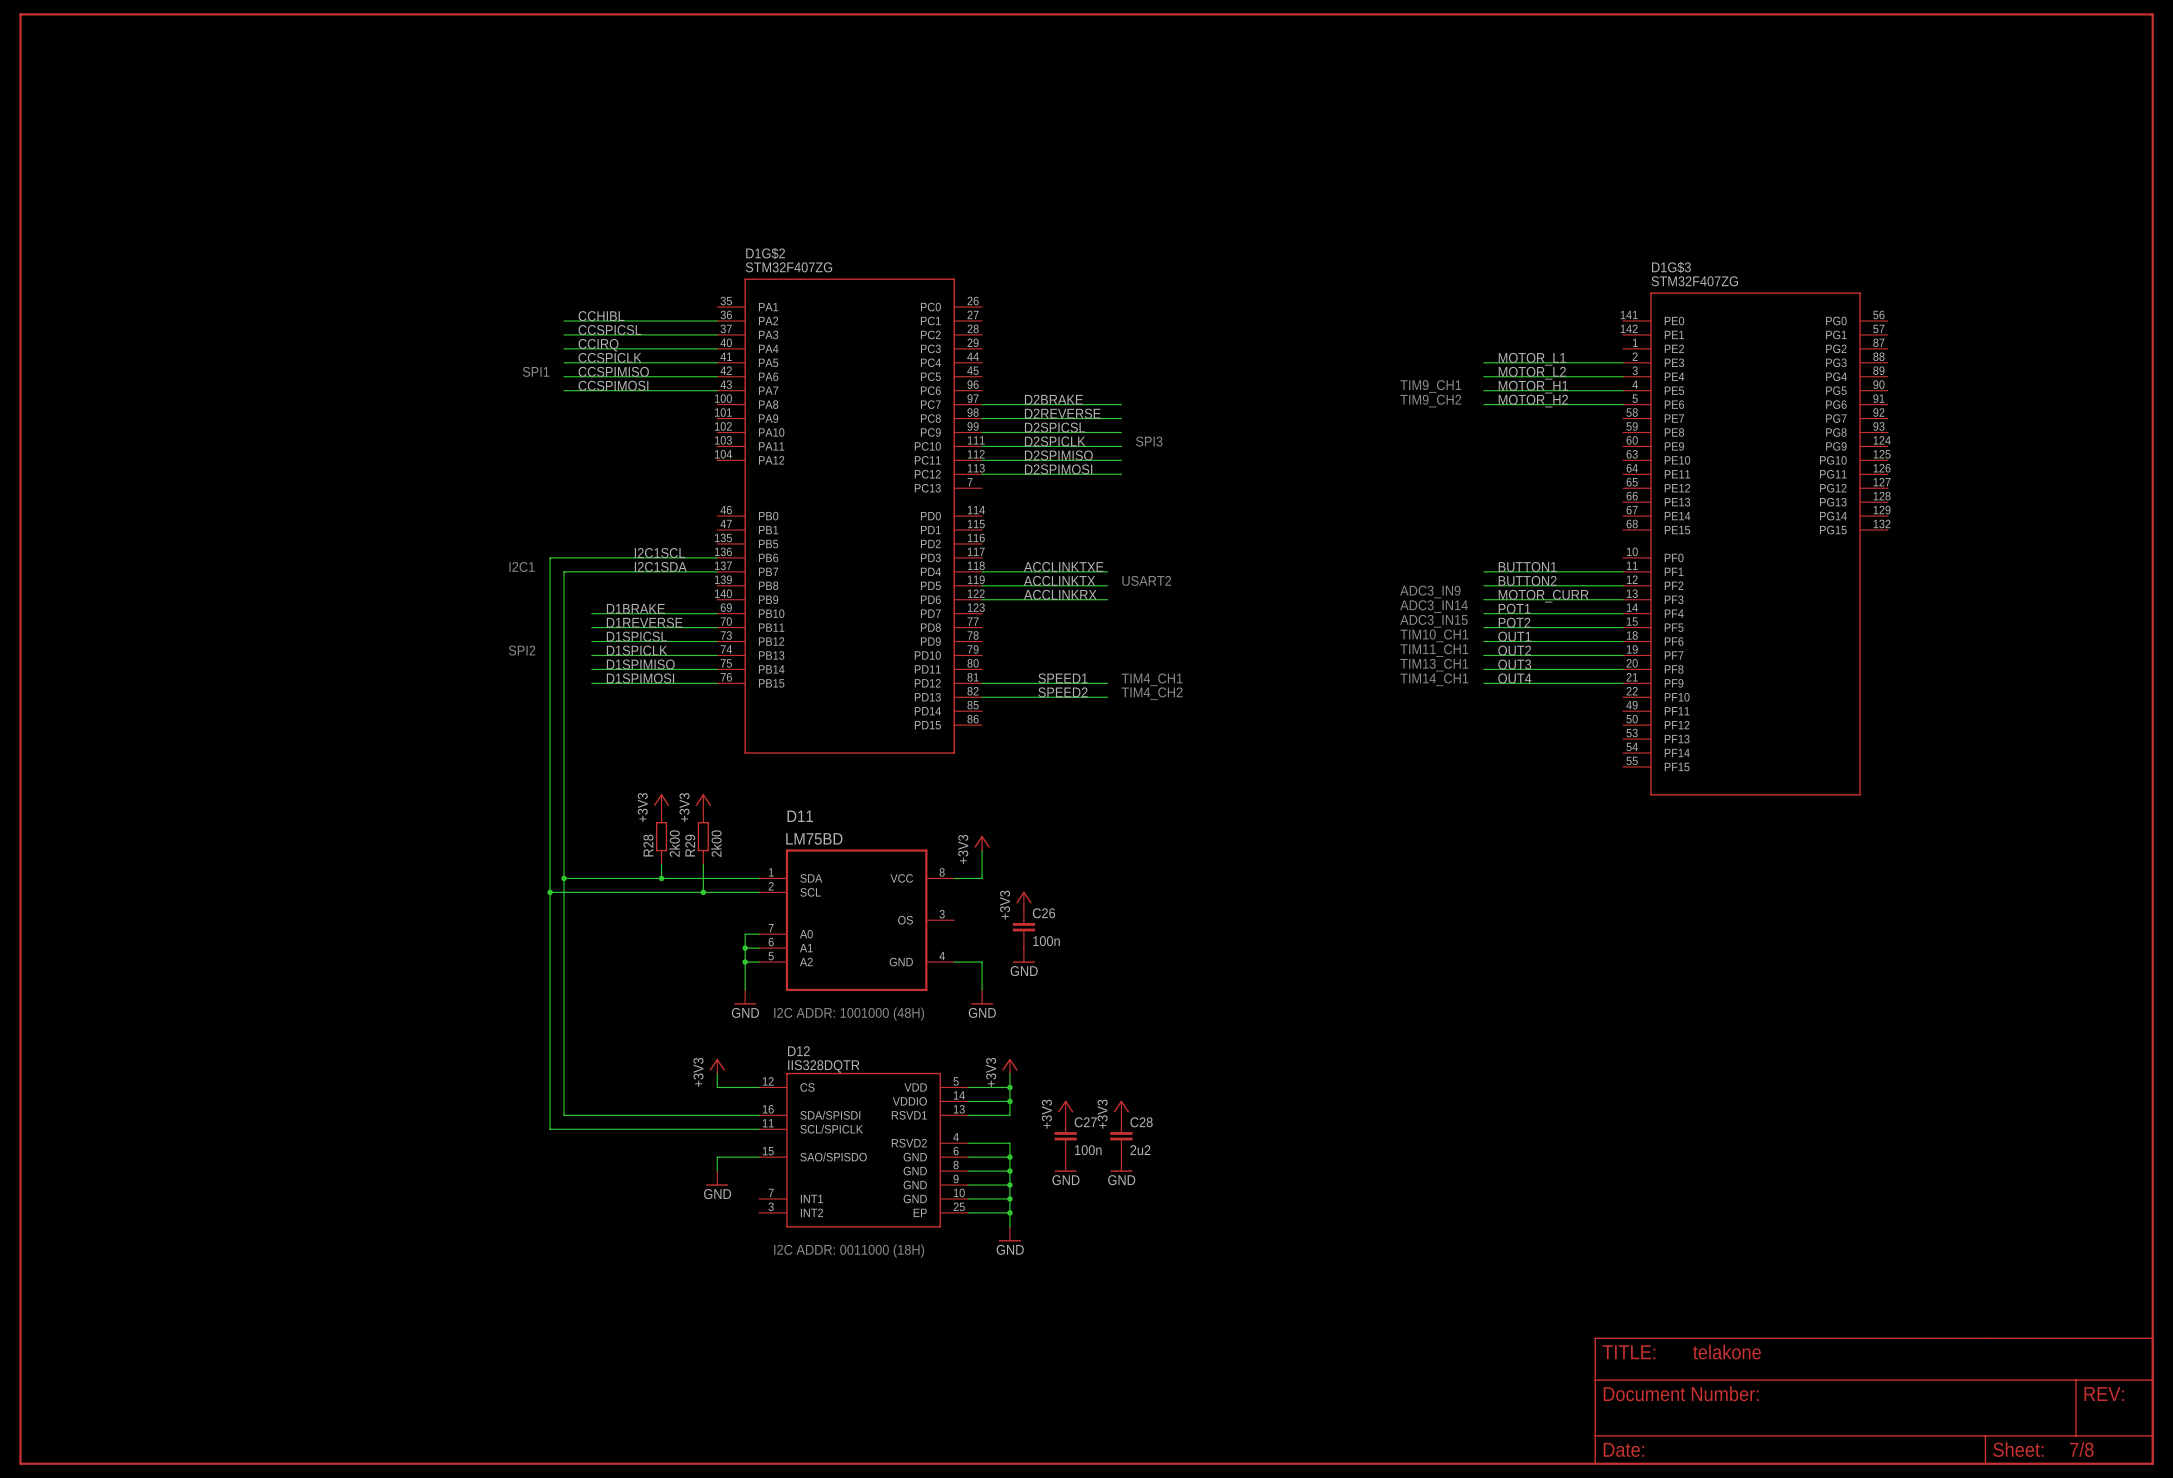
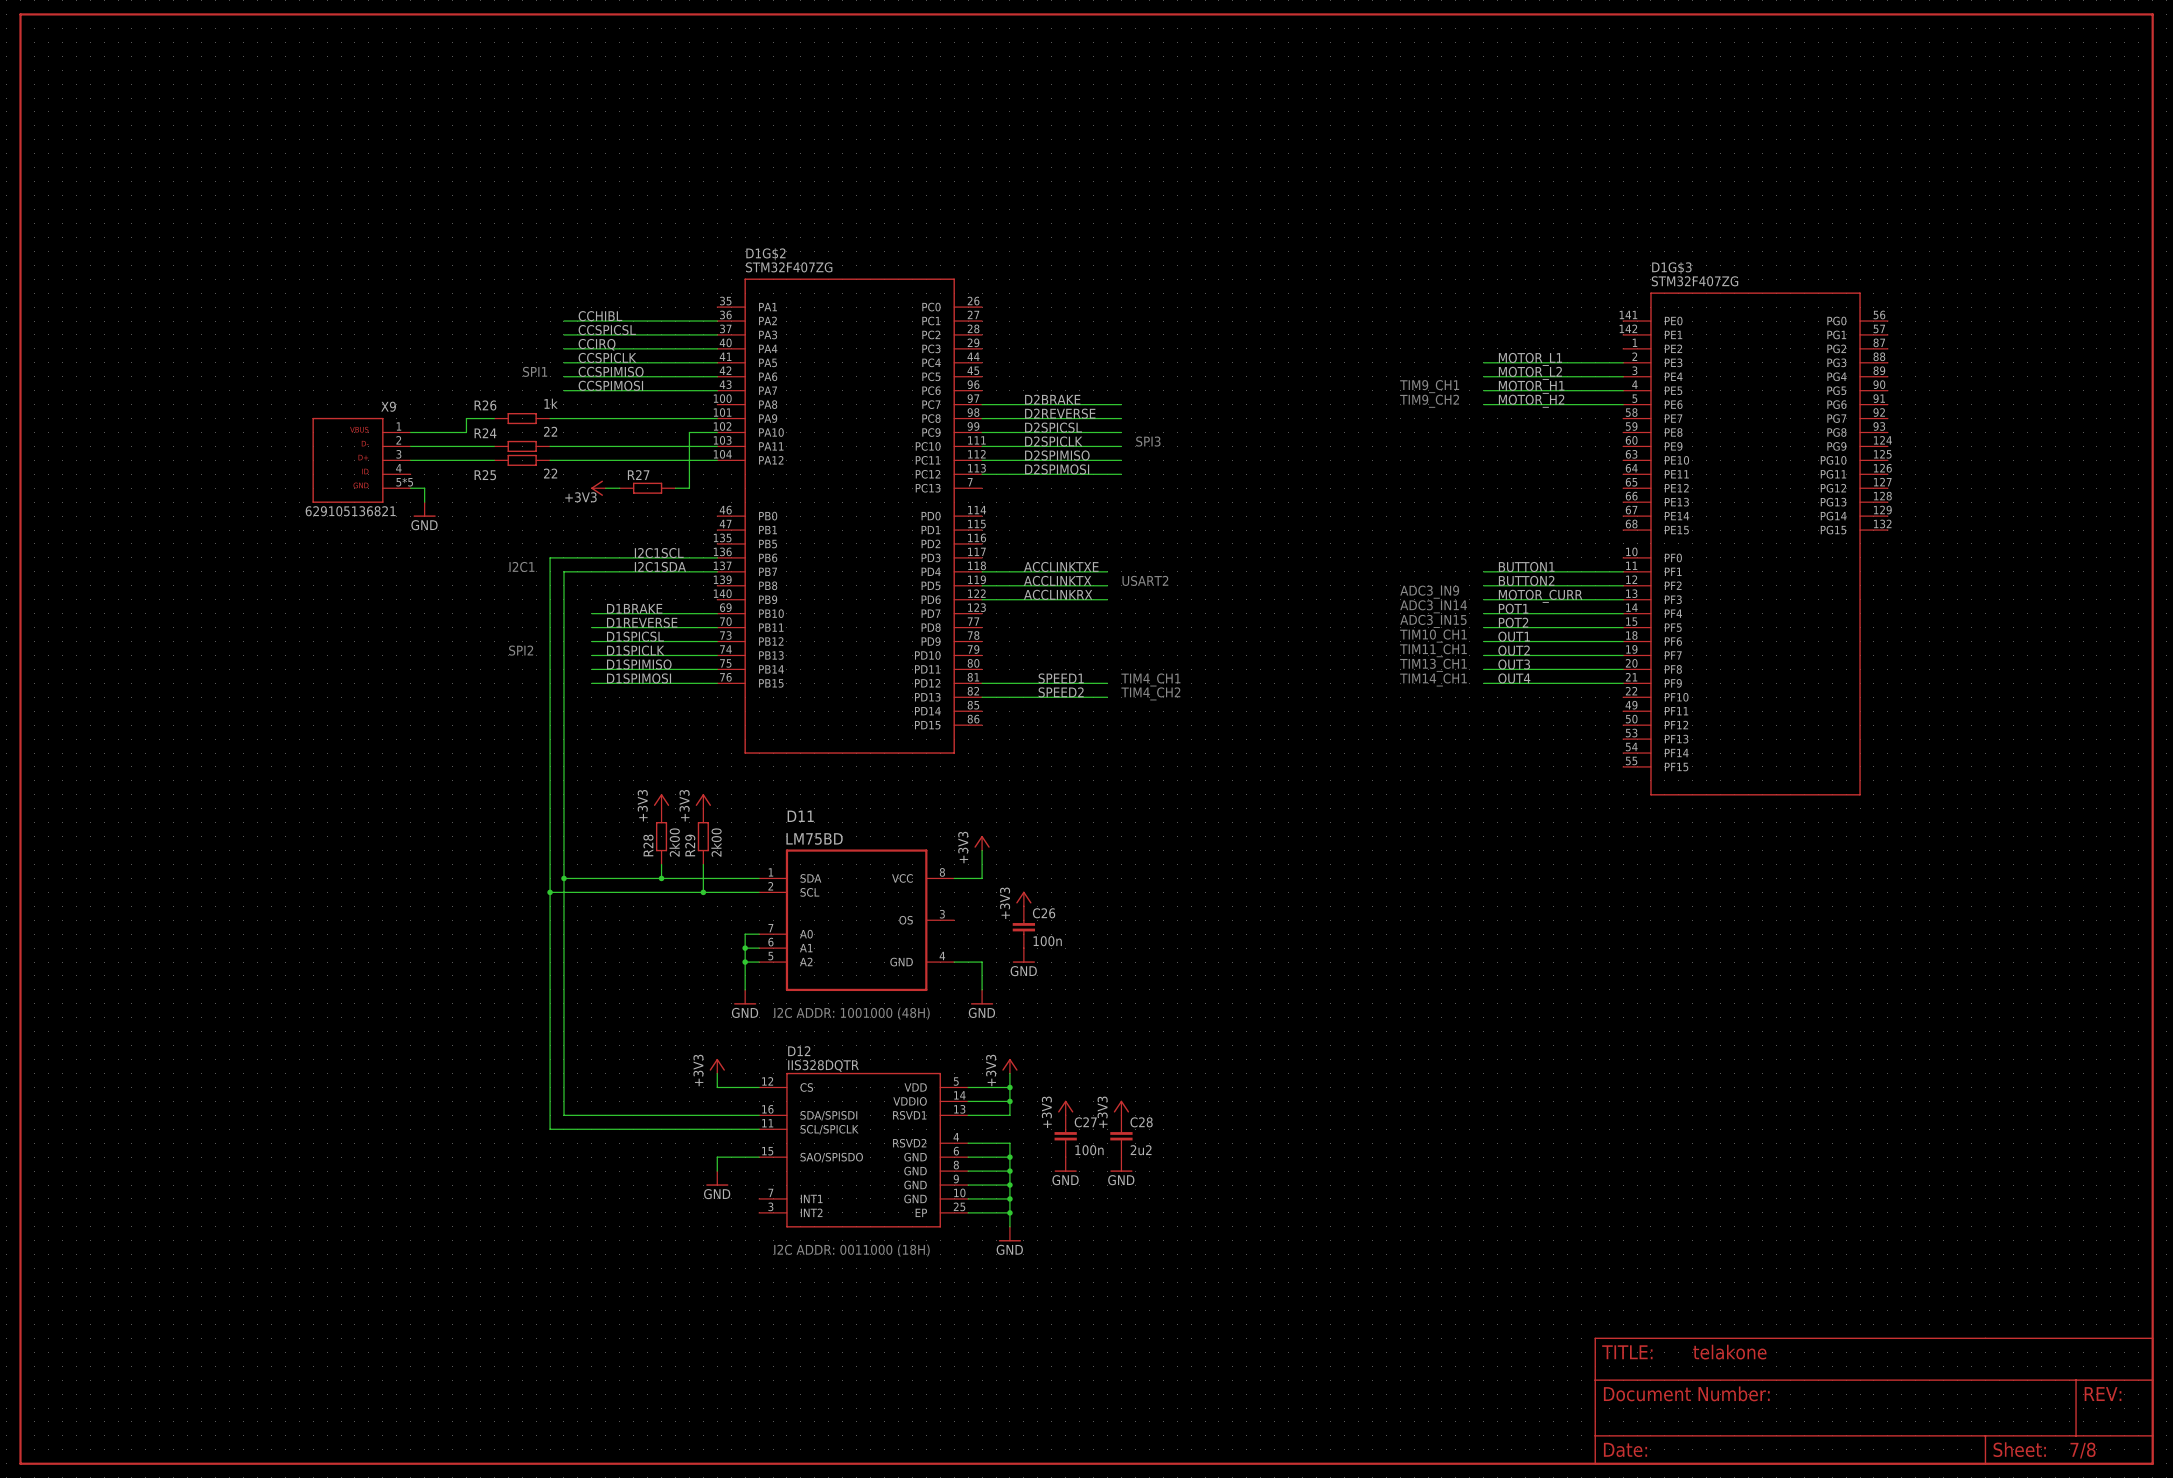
wire: none -> (494, 418) (466, 418) (466, 432) (410, 432)
R26: none -> 1k (522, 418)
wire: none -> (550, 418) (717, 418)
wire: none -> (717, 432) (689, 432) (689, 488) (675, 488)
wire: none -> (410, 446) (494, 446)
R24: none -> 22 (522, 446)
wire: none -> (550, 446) (717, 446)
X9: none -> 629105136821 (361, 460)
wire: none -> (410, 460) (494, 460)
R25: none -> 22 (522, 460)
wire: none -> (550, 460) (717, 460)
wire: none -> (410, 488) (424, 488) (424, 502)
power symbol: none -> +3V3 (598, 488)
wire: none -> (605, 488) (619, 488)
R27: none -> (647, 488)
power symbol: none -> GND (424, 509)

